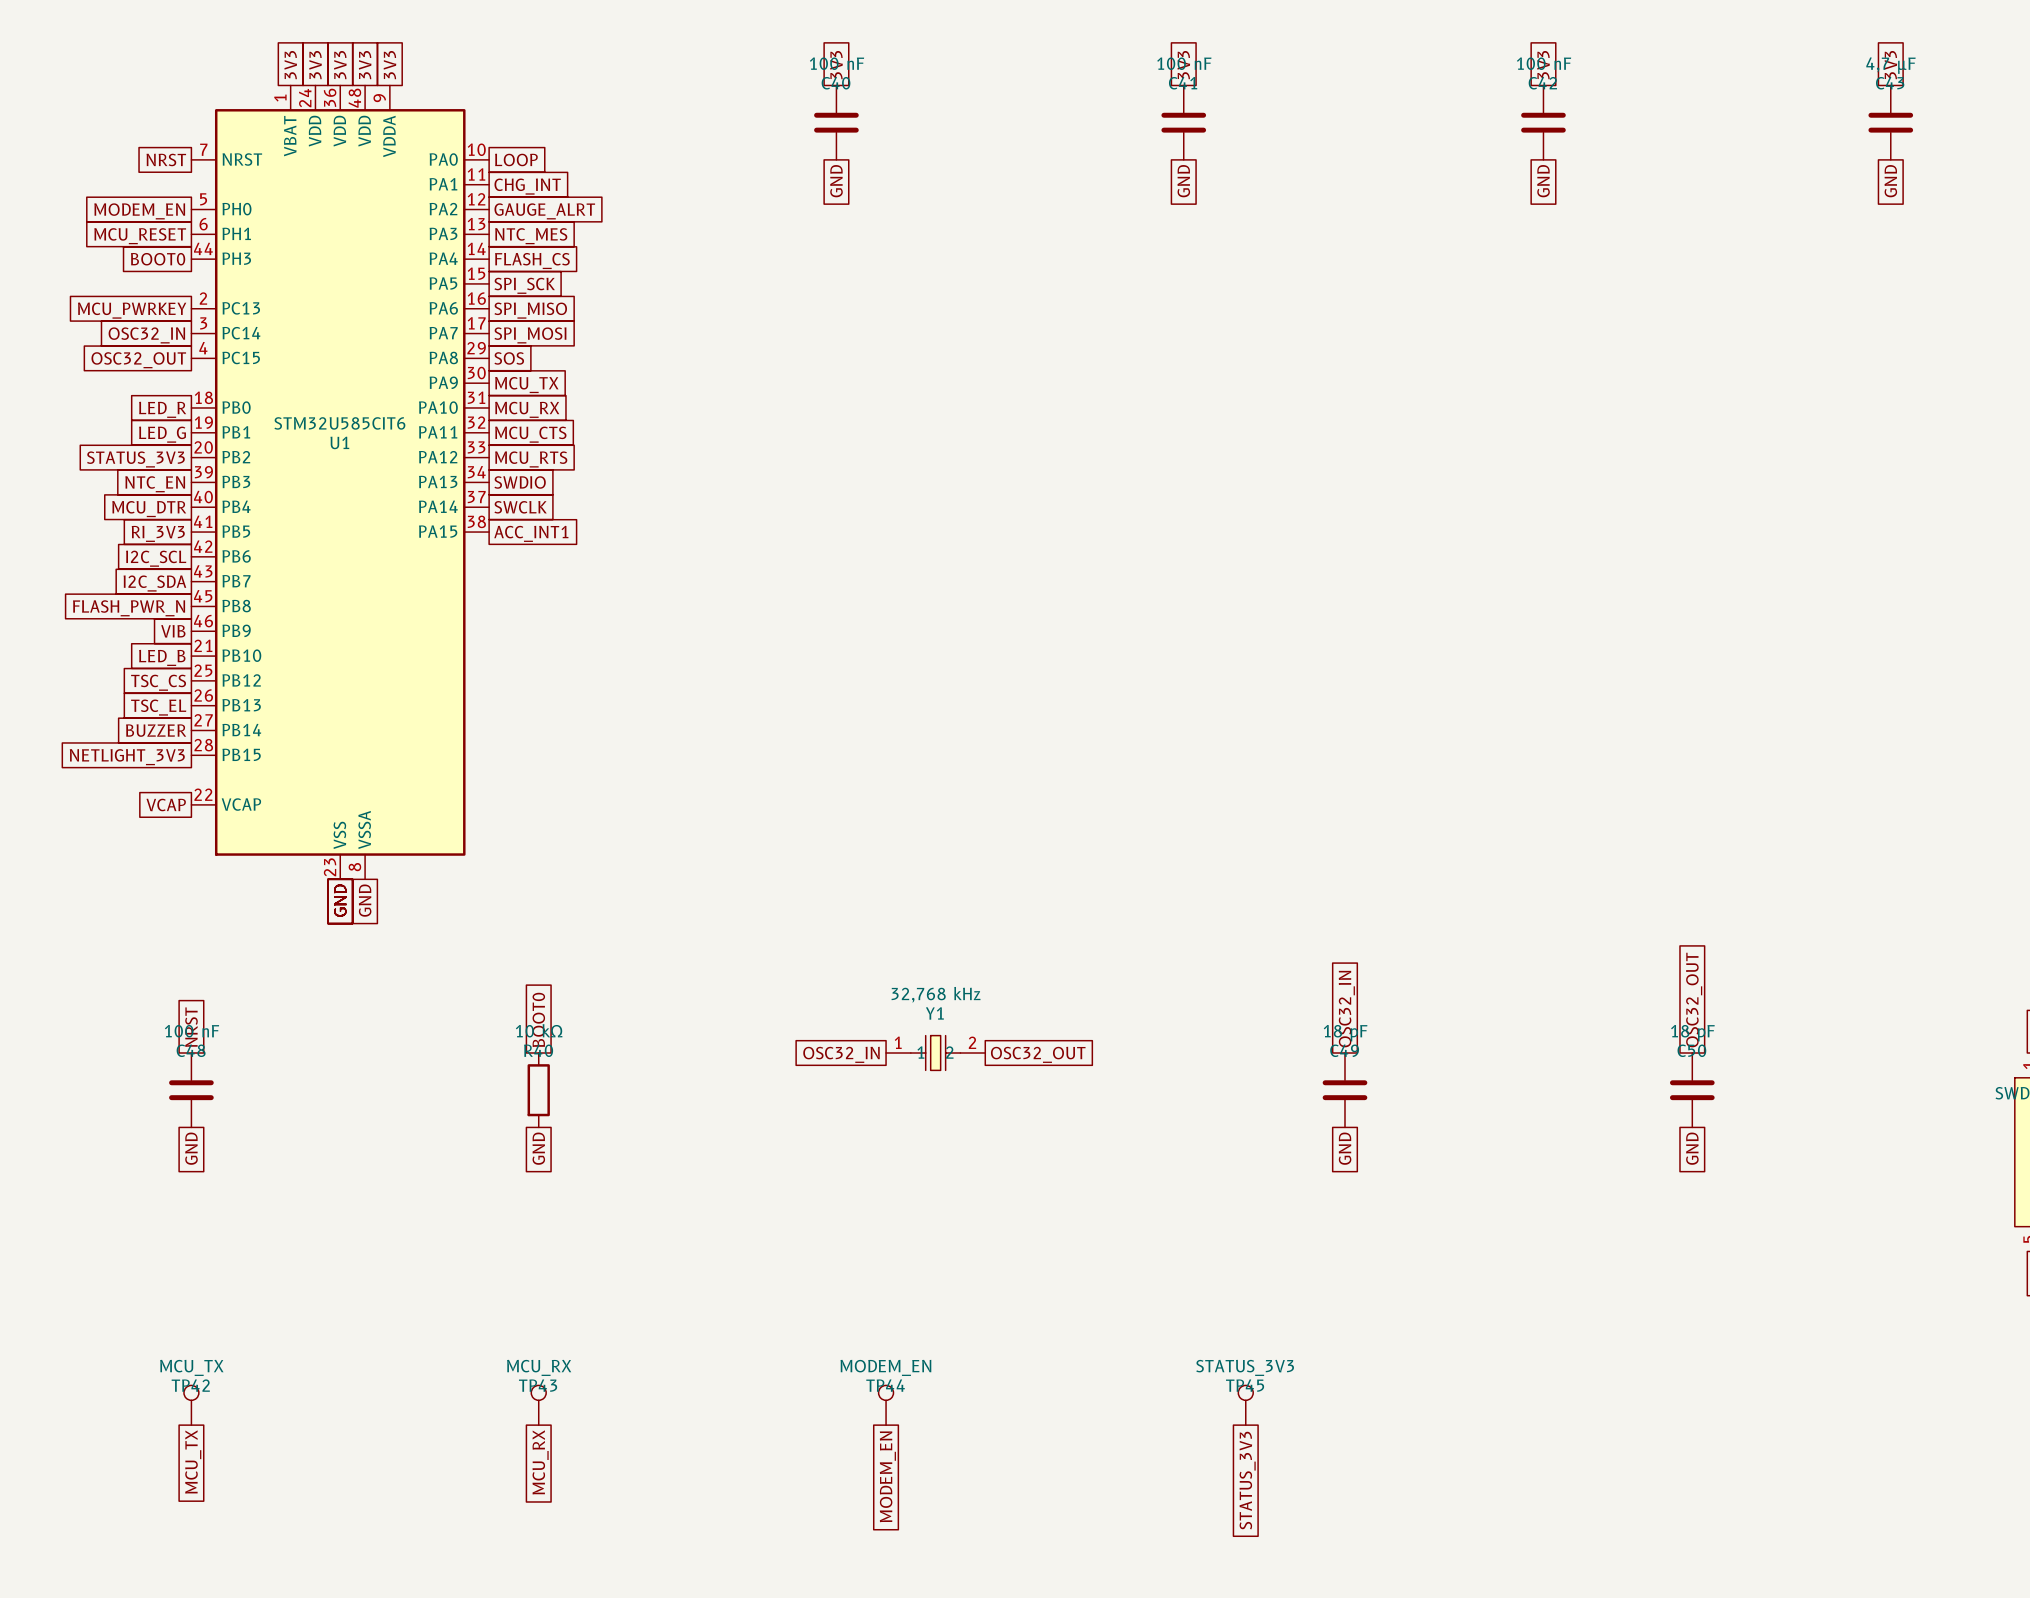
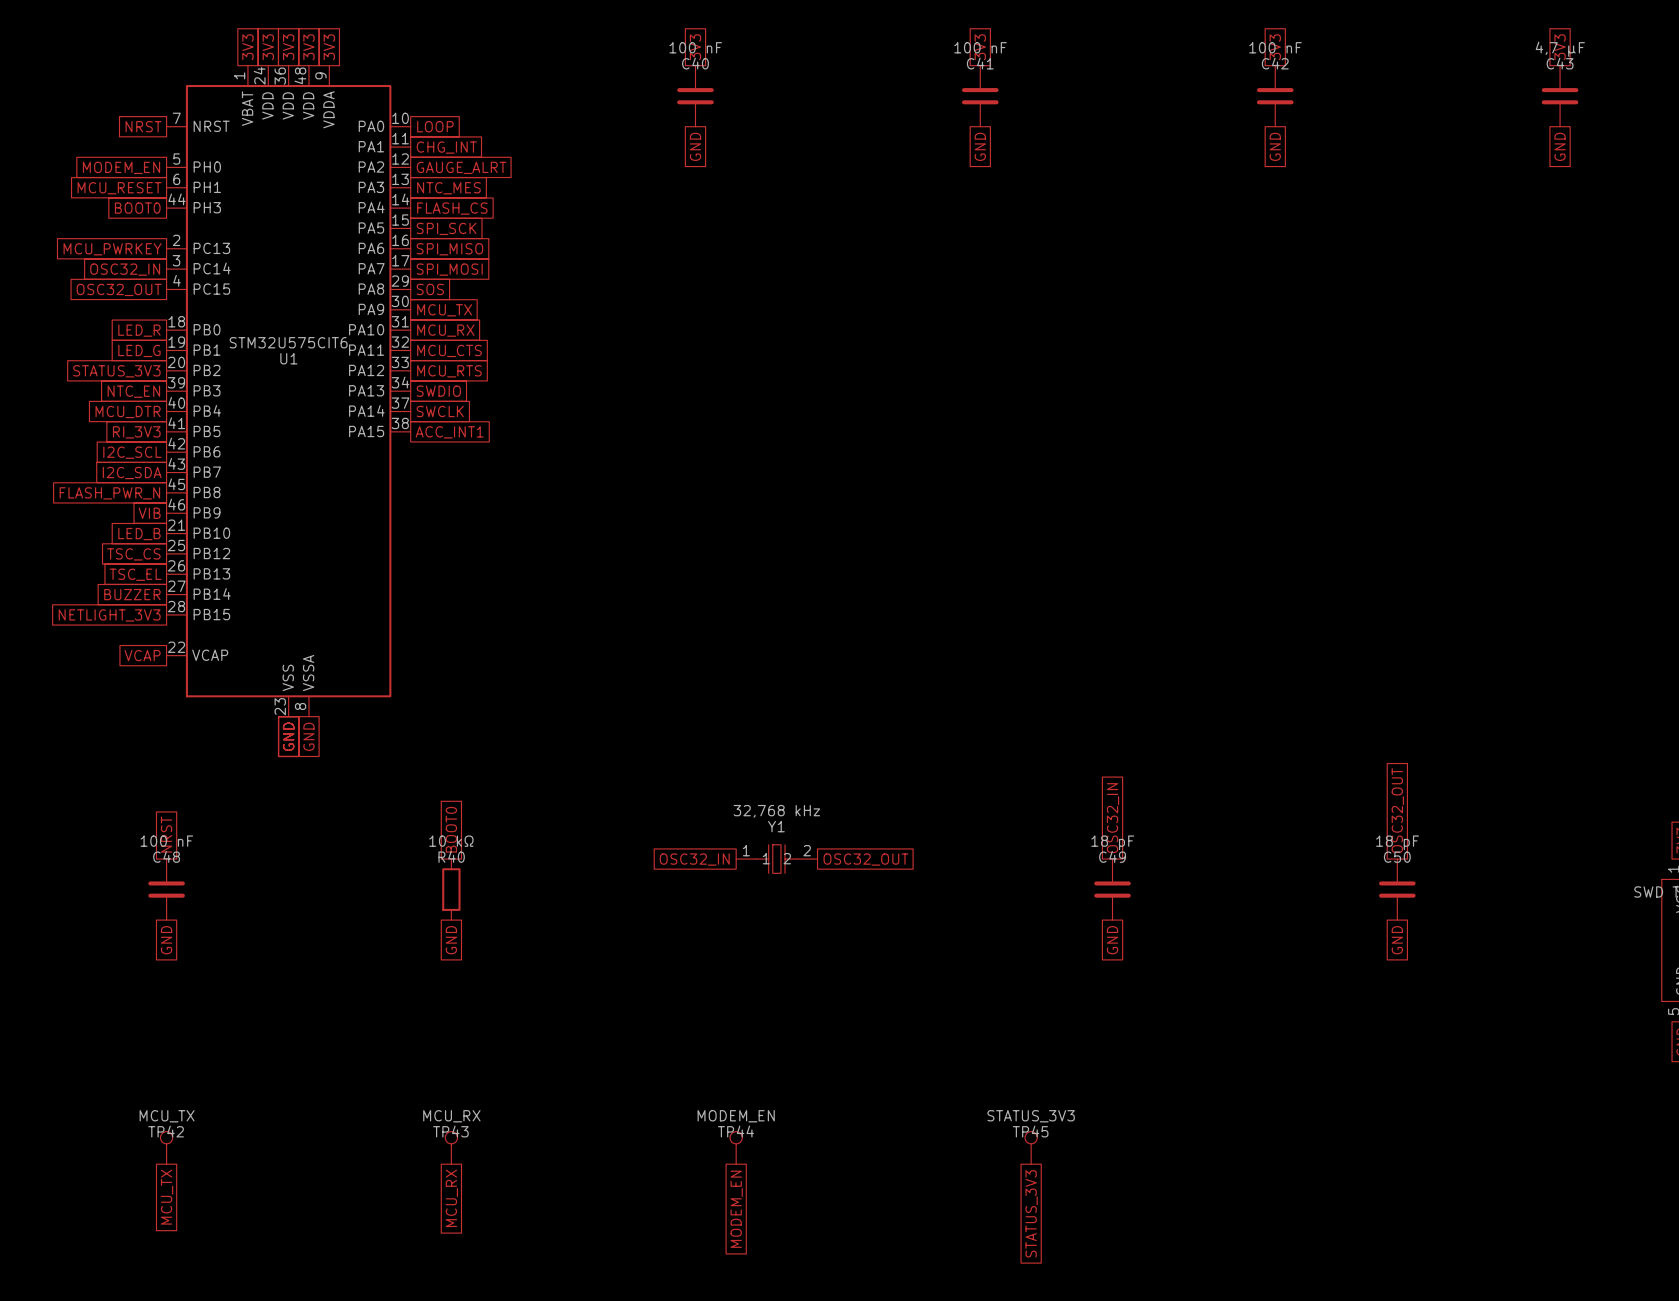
U1 value: STM32U585CIT6 (339, 423) -> STM32U575CIT6 (288, 342)

